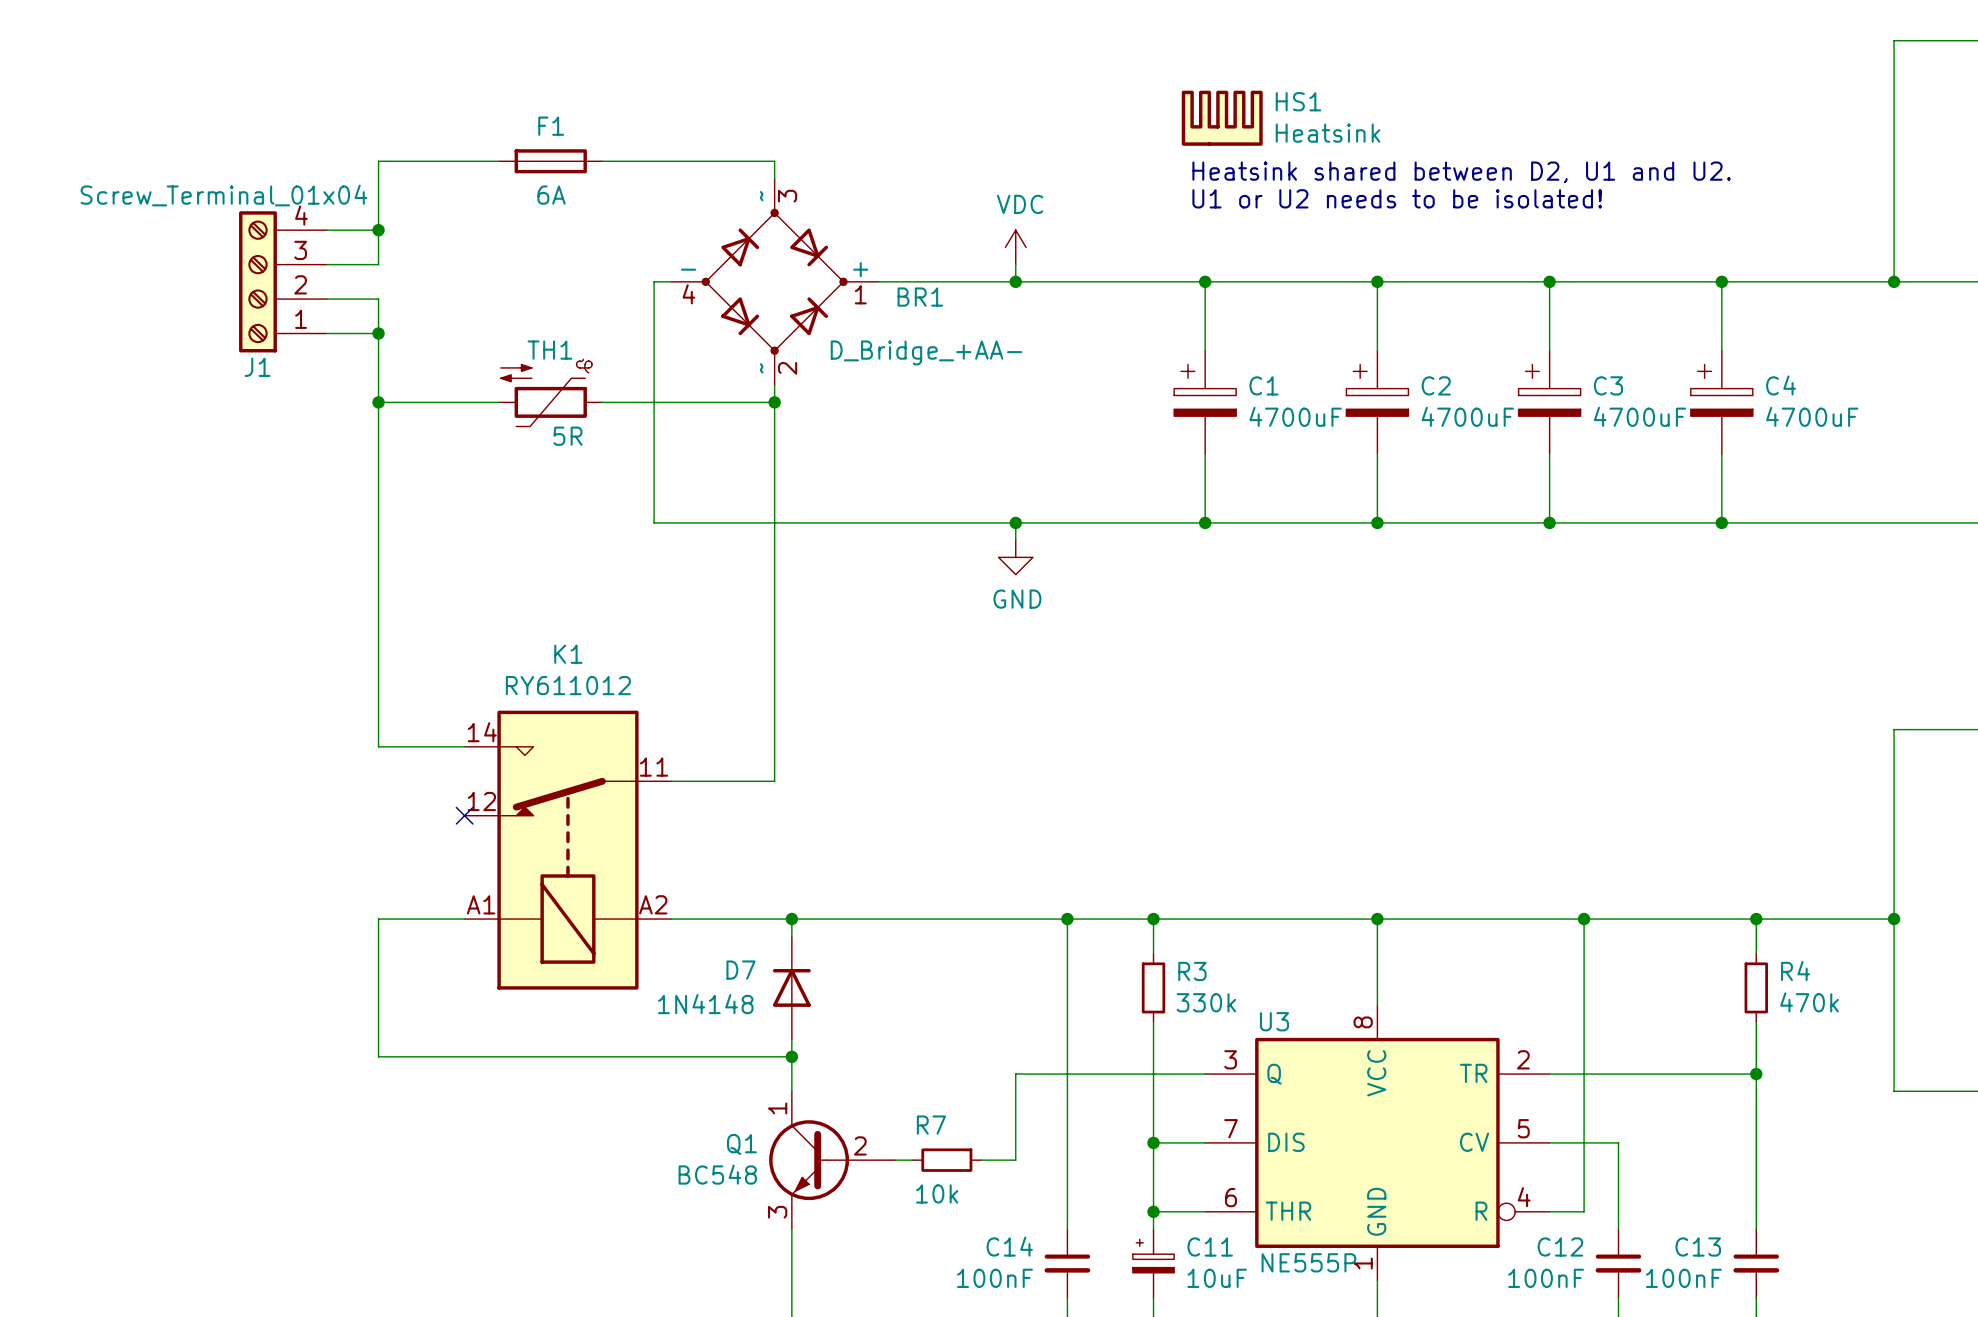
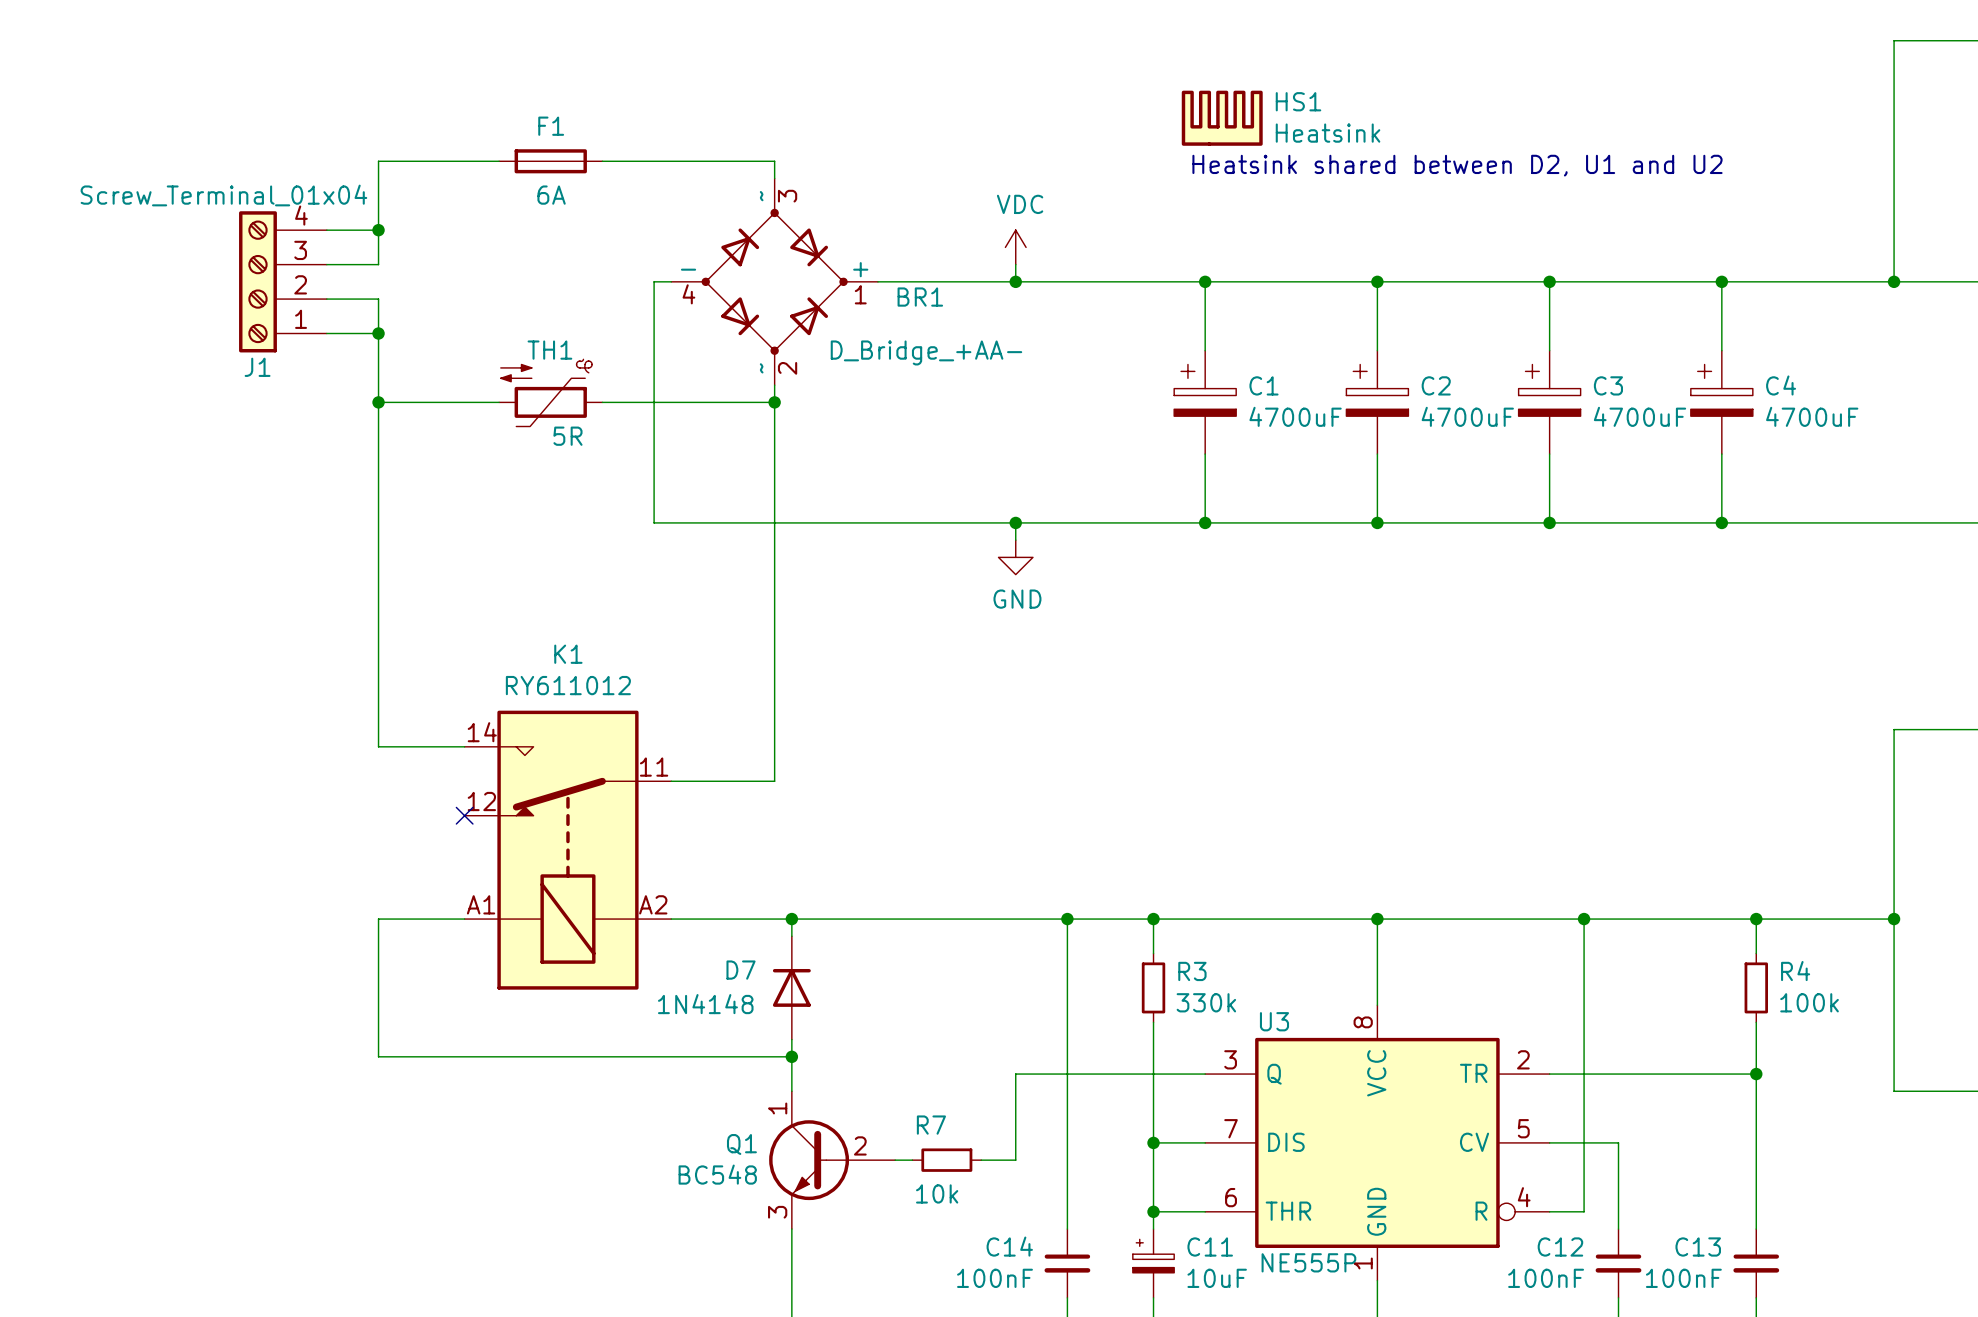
text: Heatsink shared between D2, U1 and U2. (1461, 172) -> Heatsink shared between D2, U1 and U2 (1457, 165)
text: U1 or U2 needs to be isolated! (1397, 198) -> none
R4 value: 470k (1809, 1002) -> 100k (1809, 1002)

